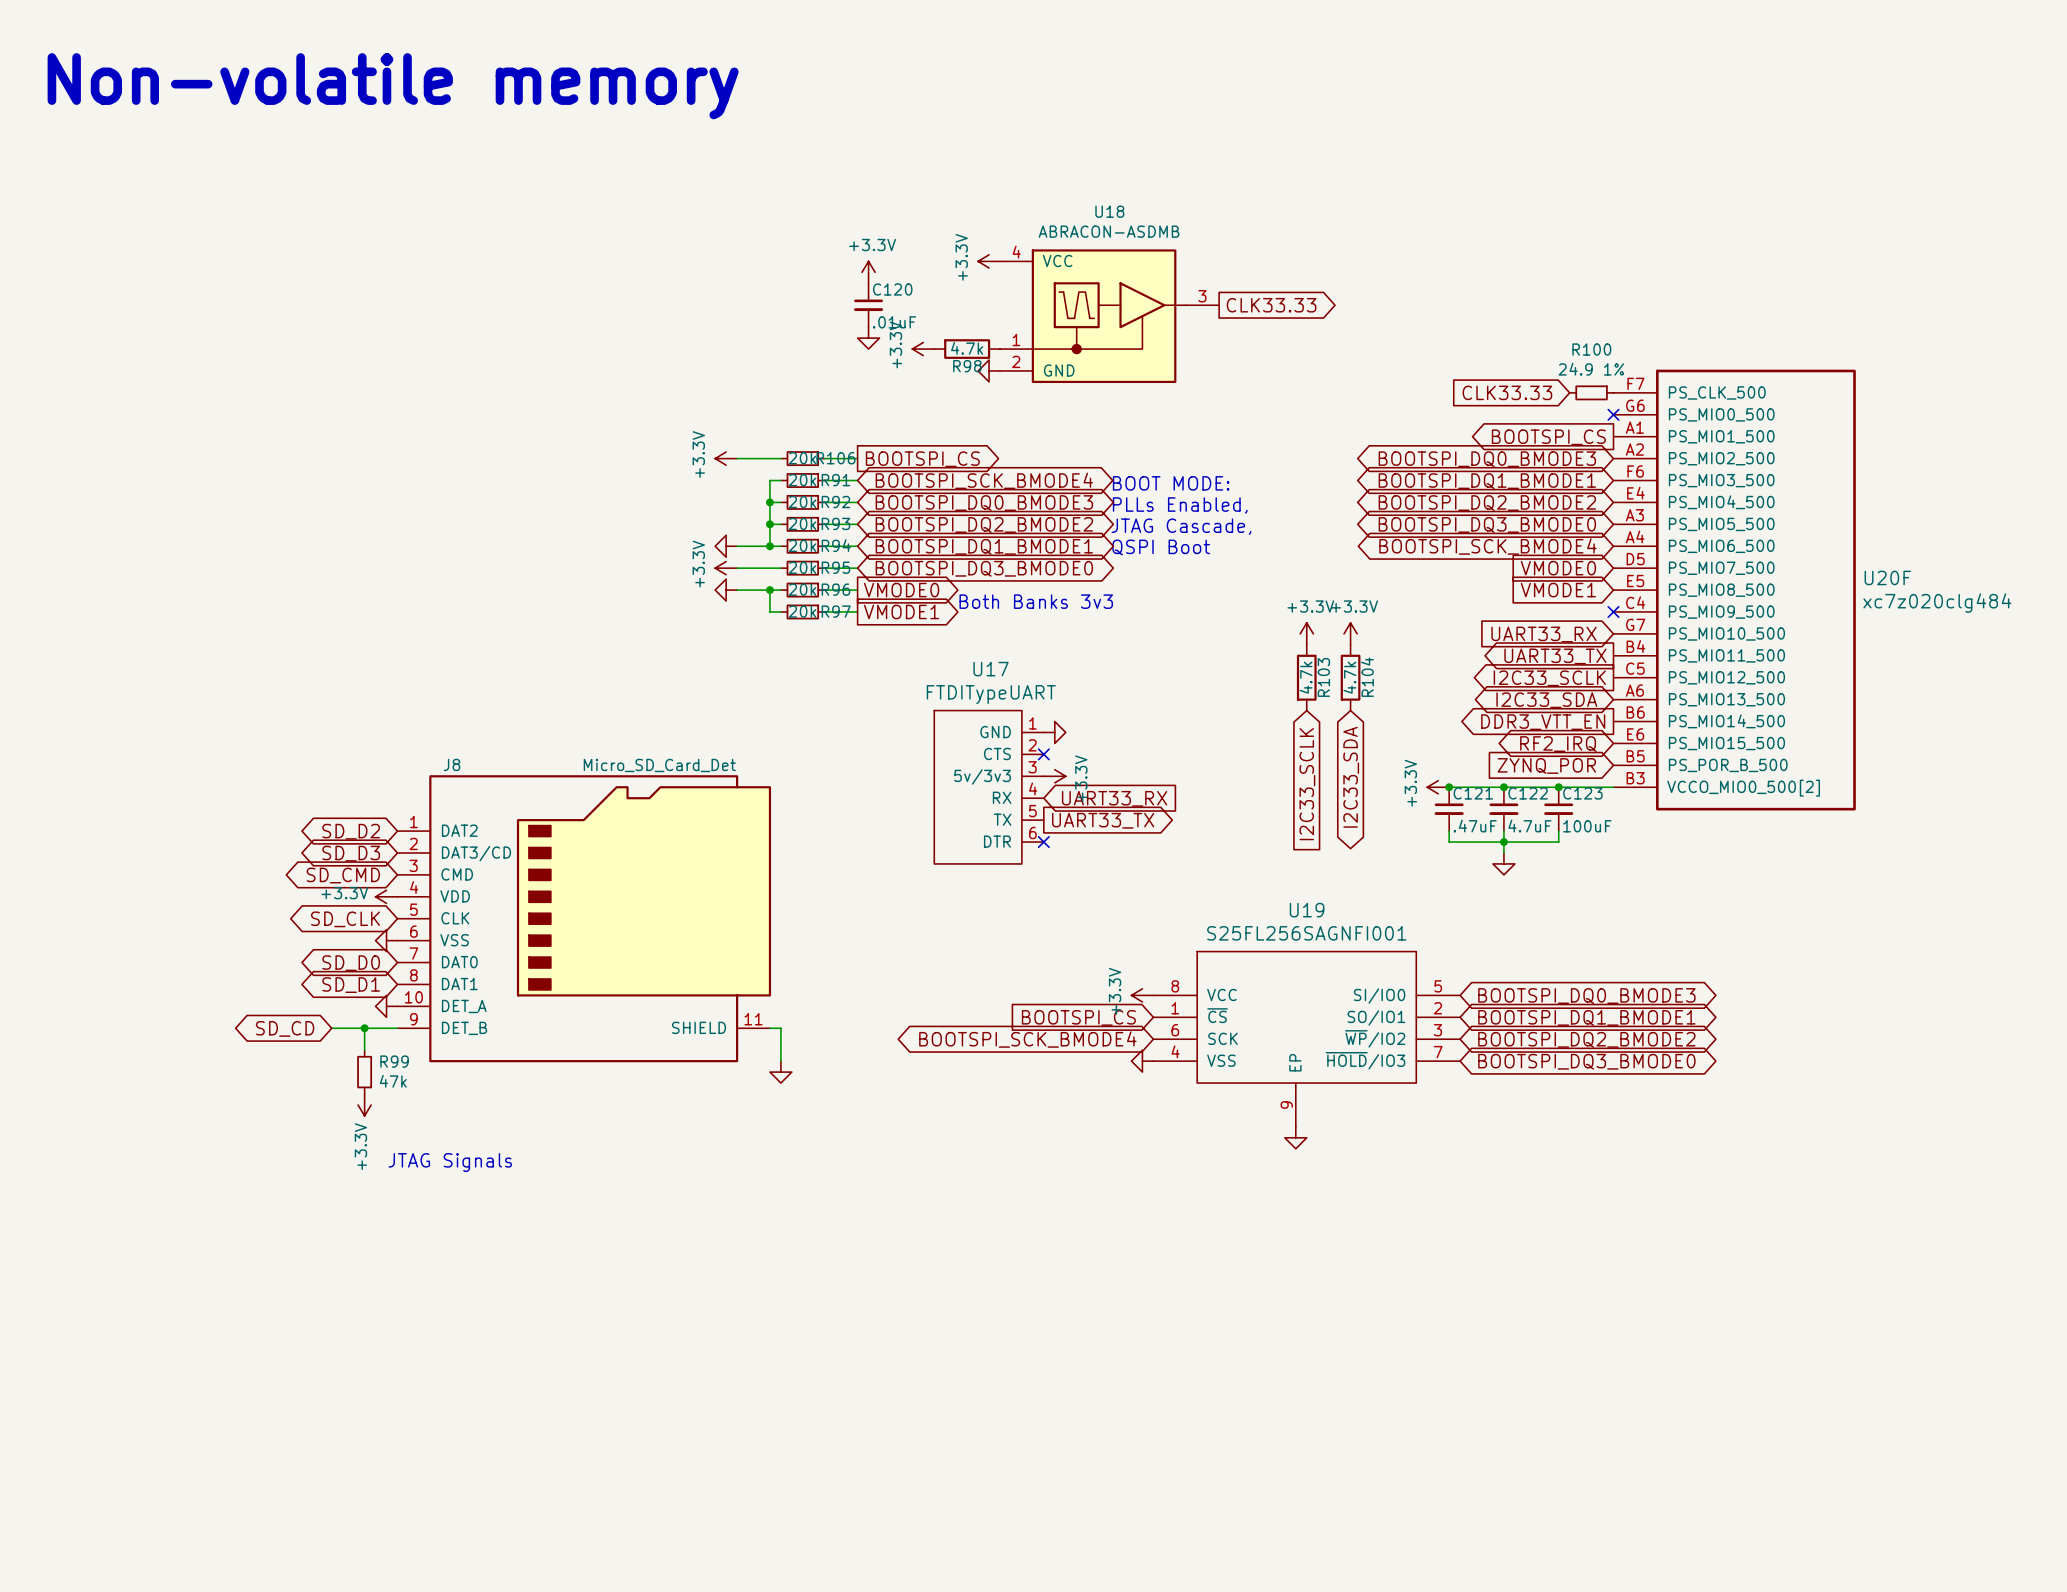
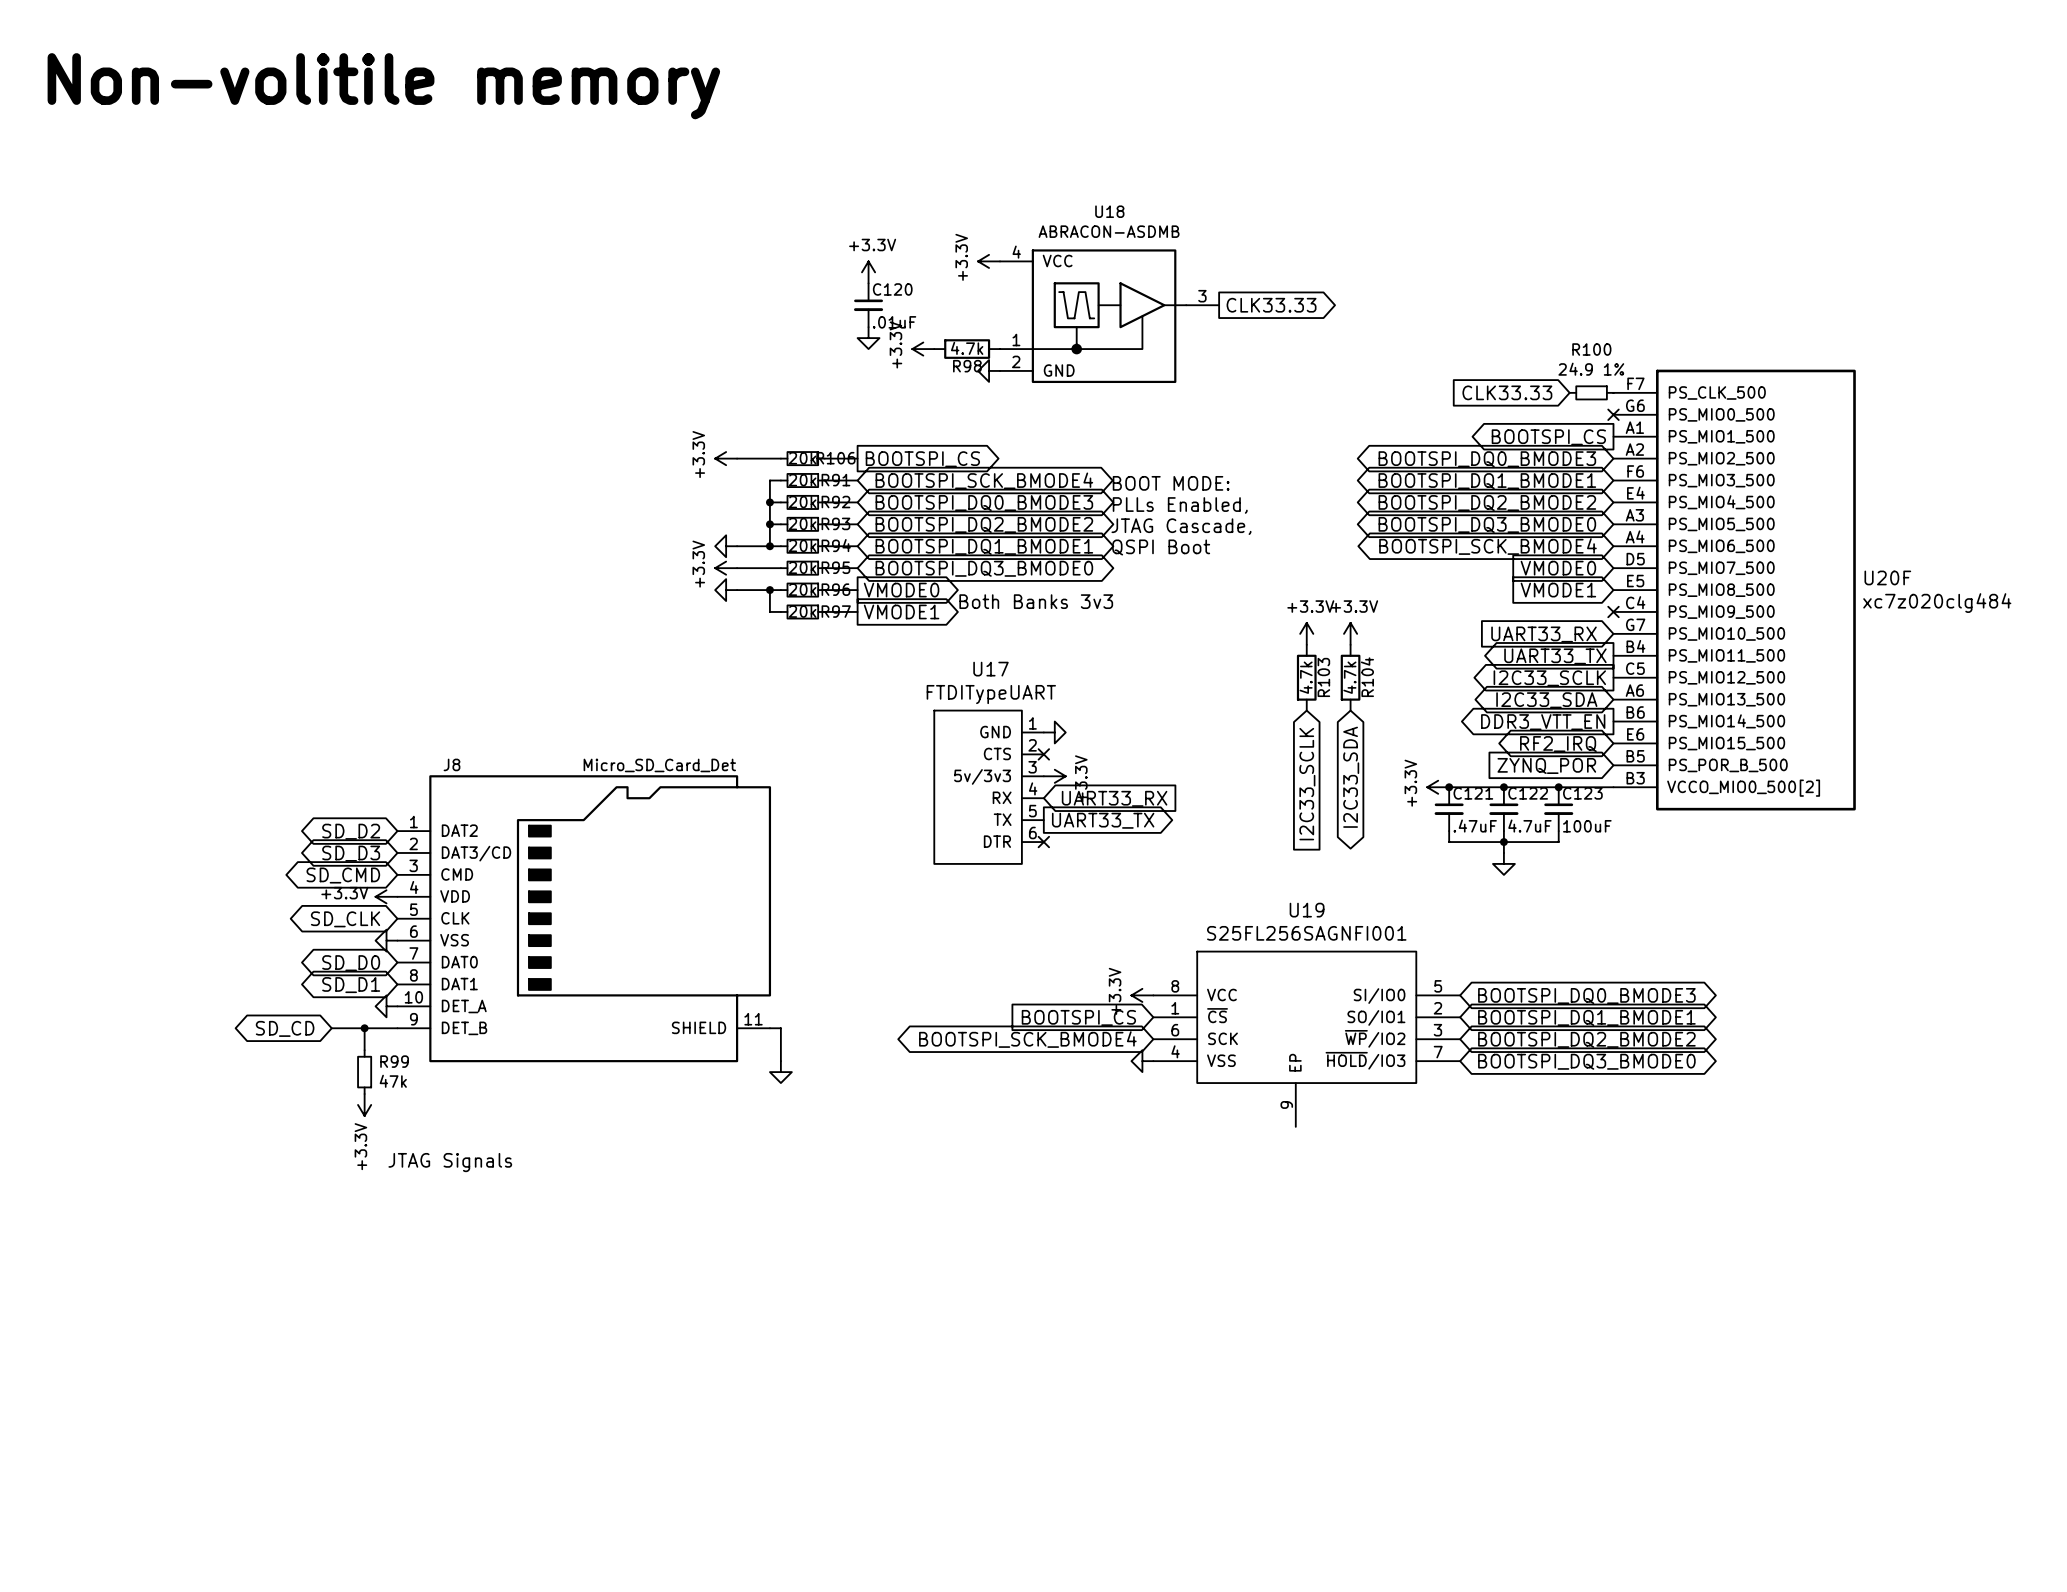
text: Non-volatile memory (393, 86) -> Non-volitile memory (383, 86)
power symbol: (1295, 1137) -> none

